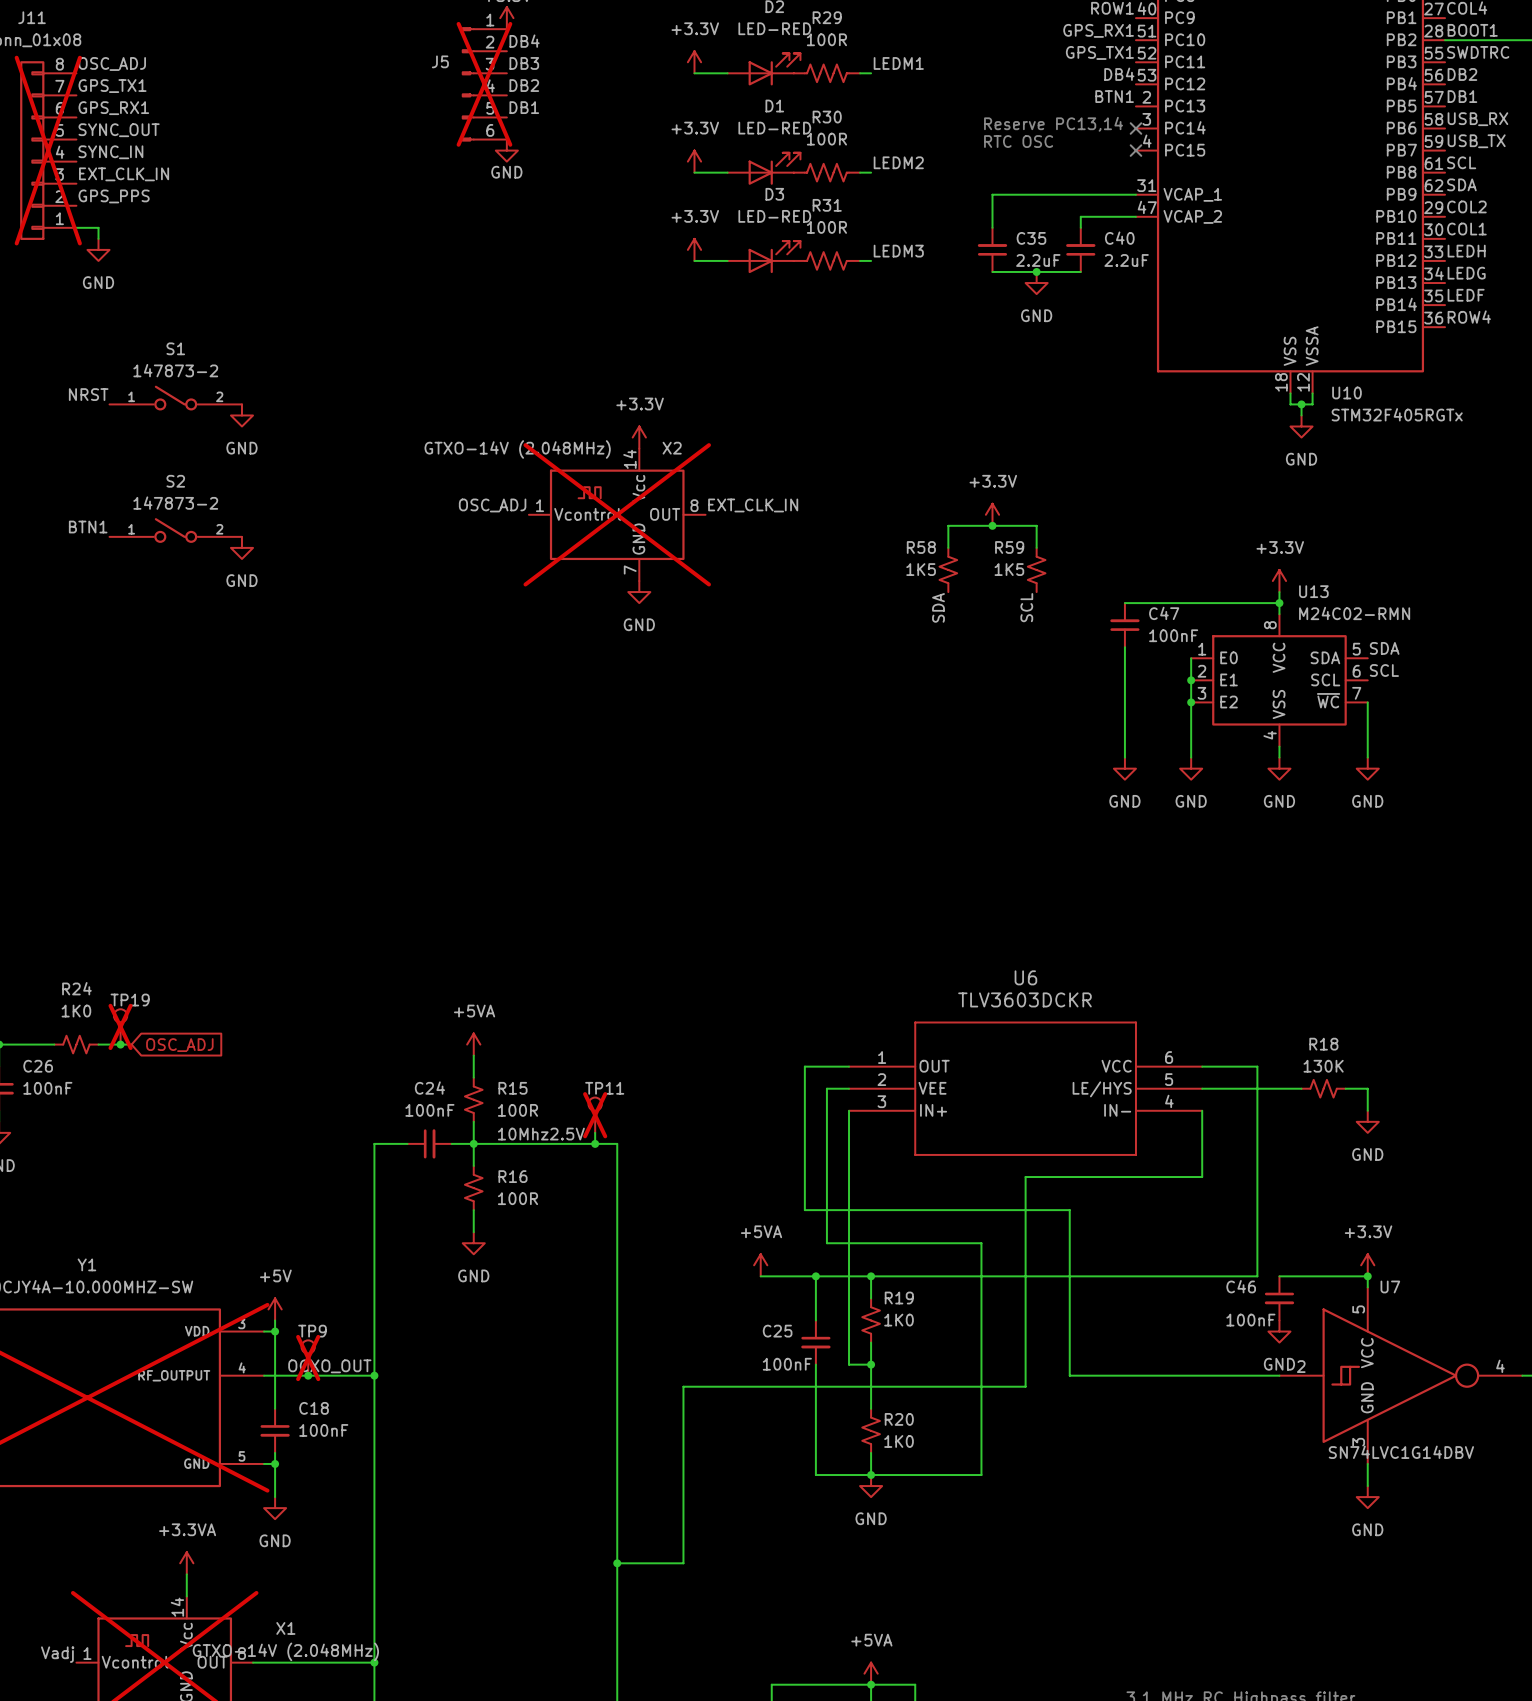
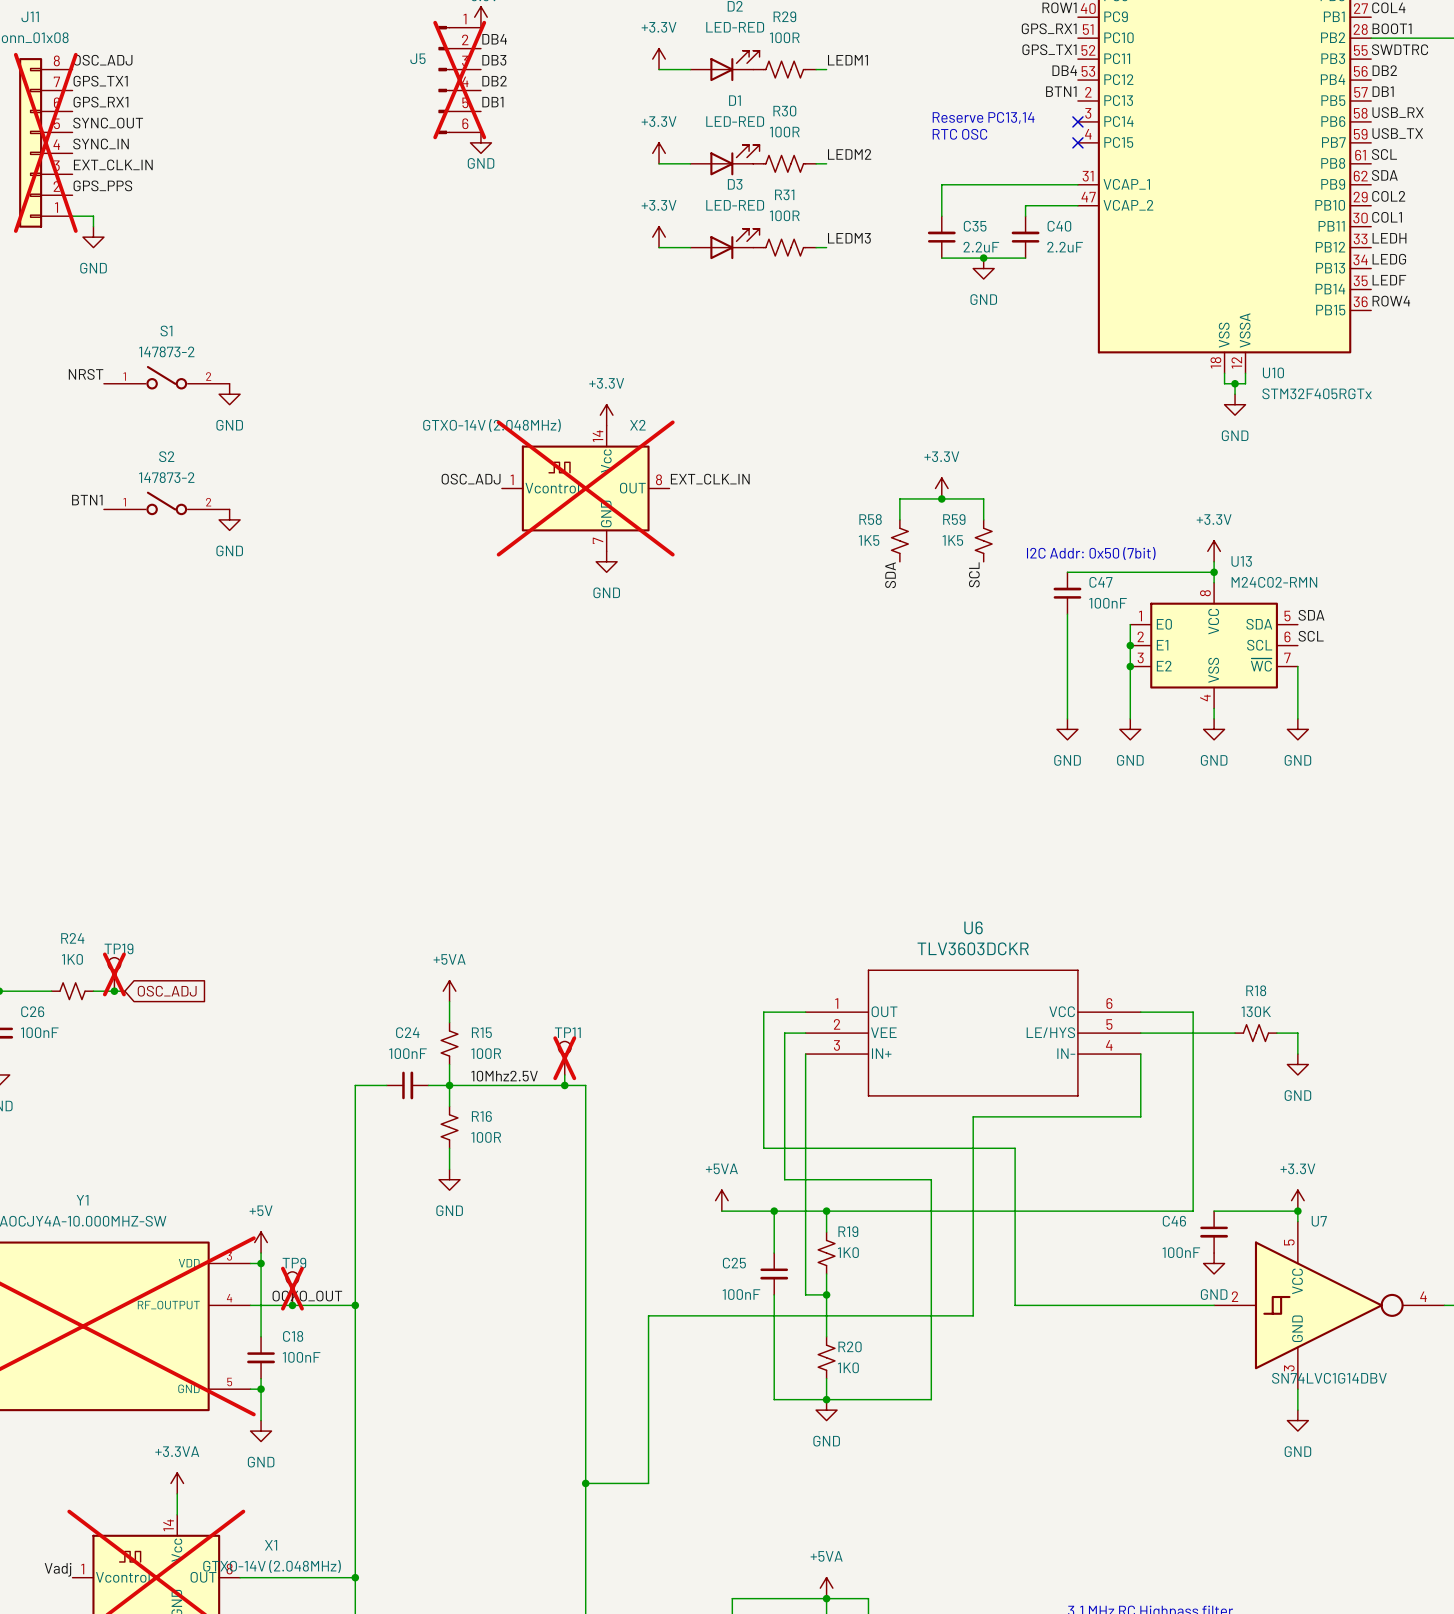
text: none -> I2C Addr: 0x50 (7bit) (1091, 553)

